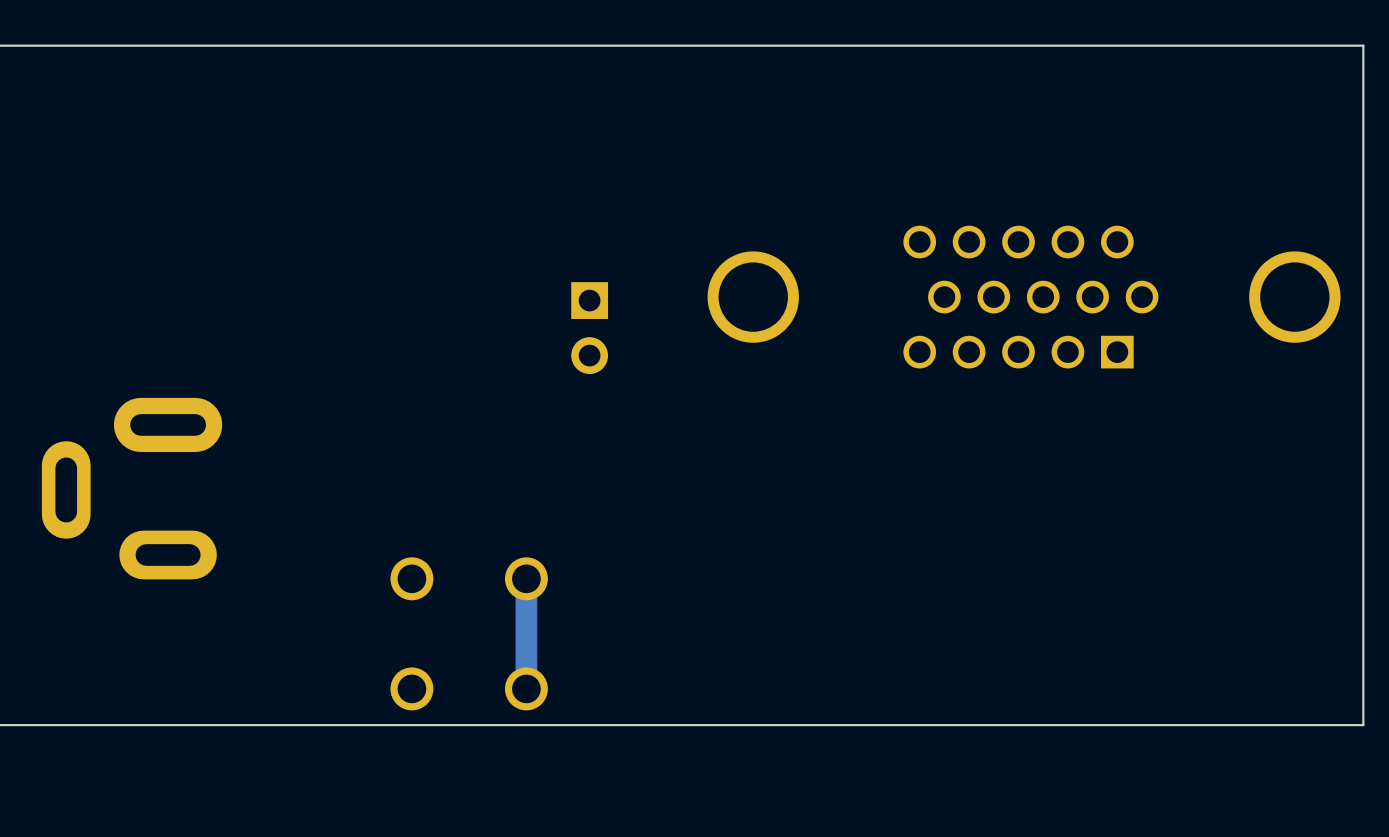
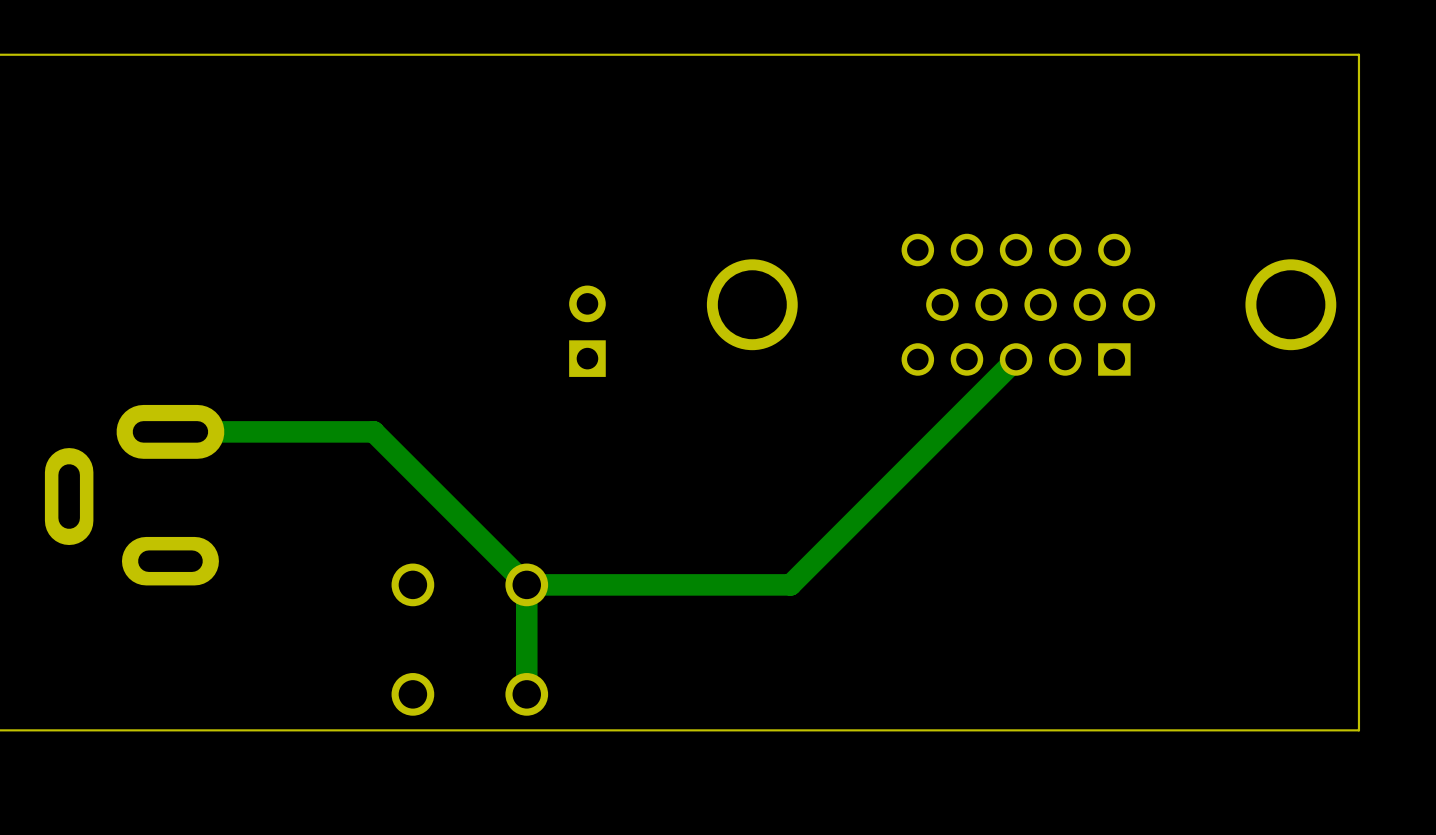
part rotation: 0° (589, 328) -> 180° (587, 331)
track: none -> (1016, 359) (790, 584) (526, 584) (373, 431) (170, 431)

